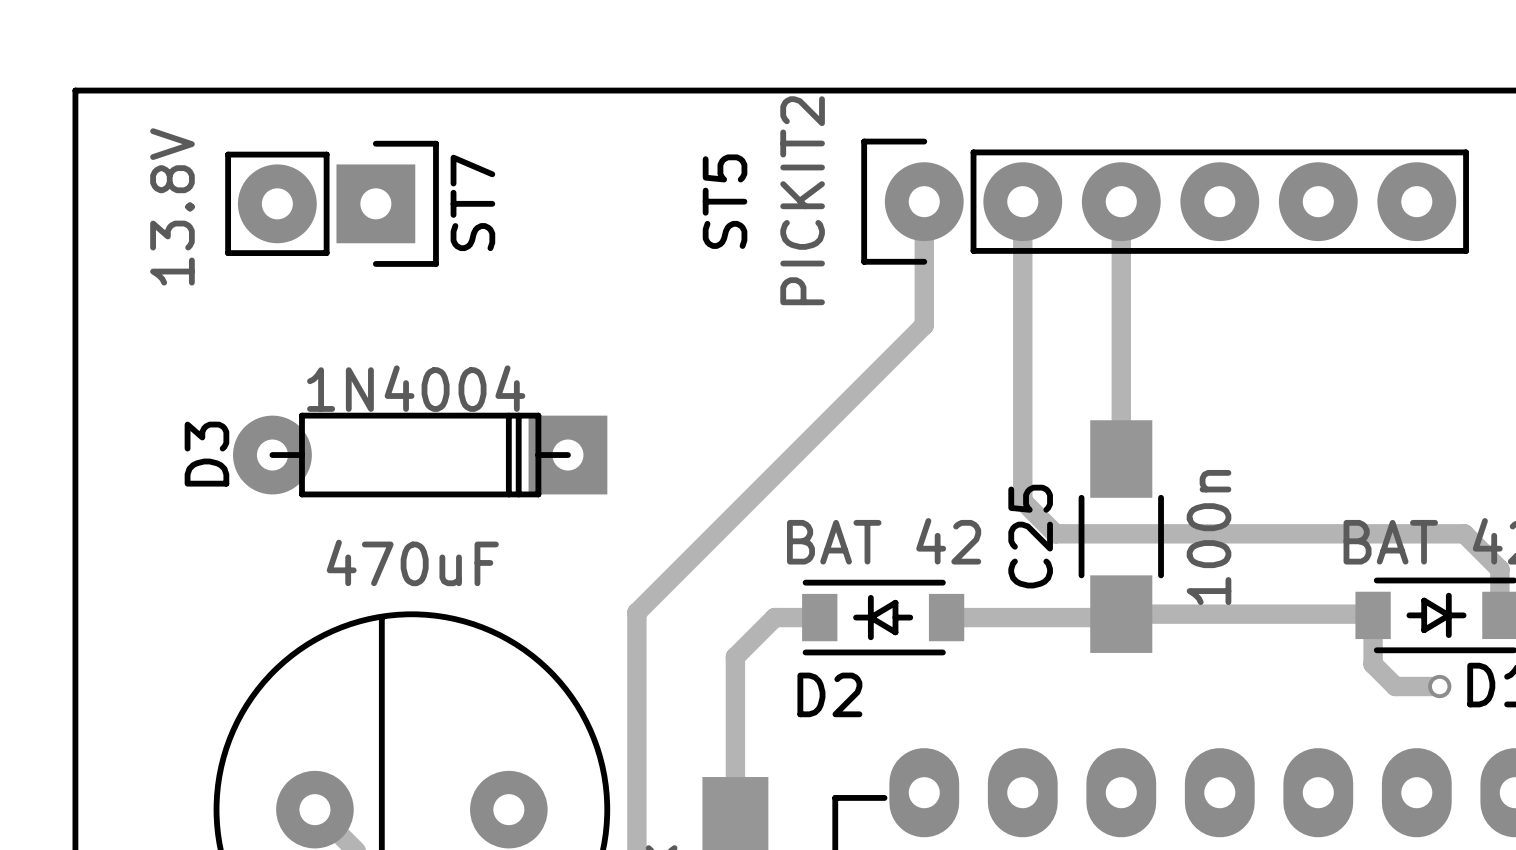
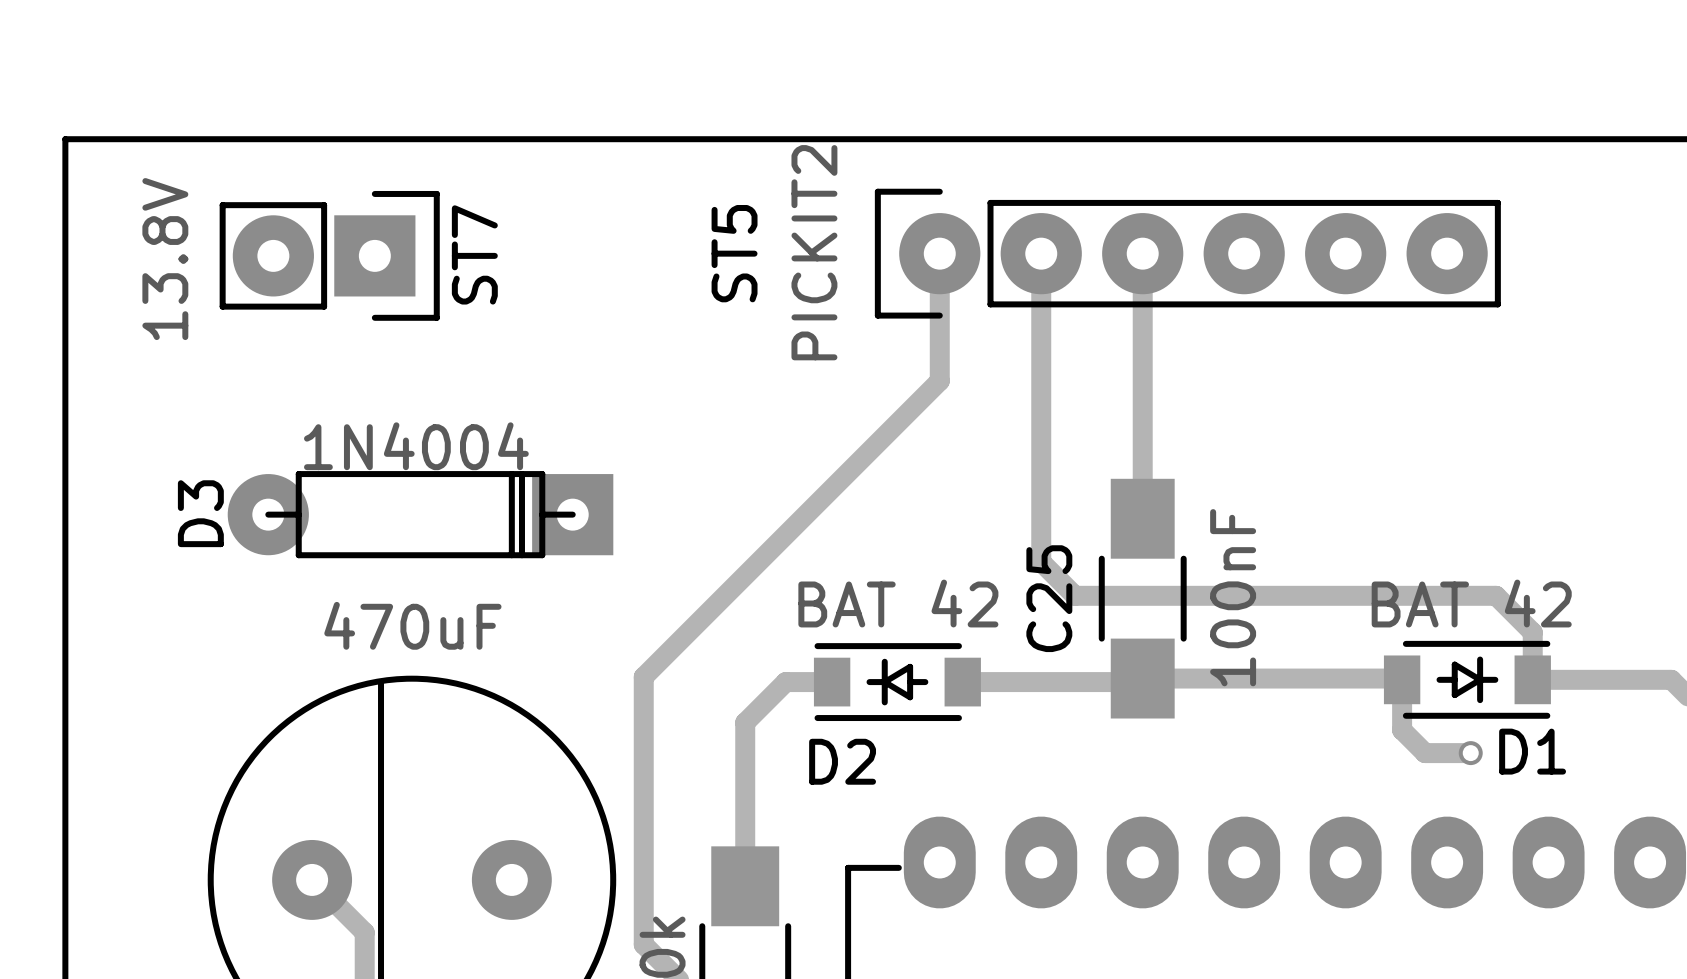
C25 value: 100n (1209, 537) -> 100nF (1233, 597)

